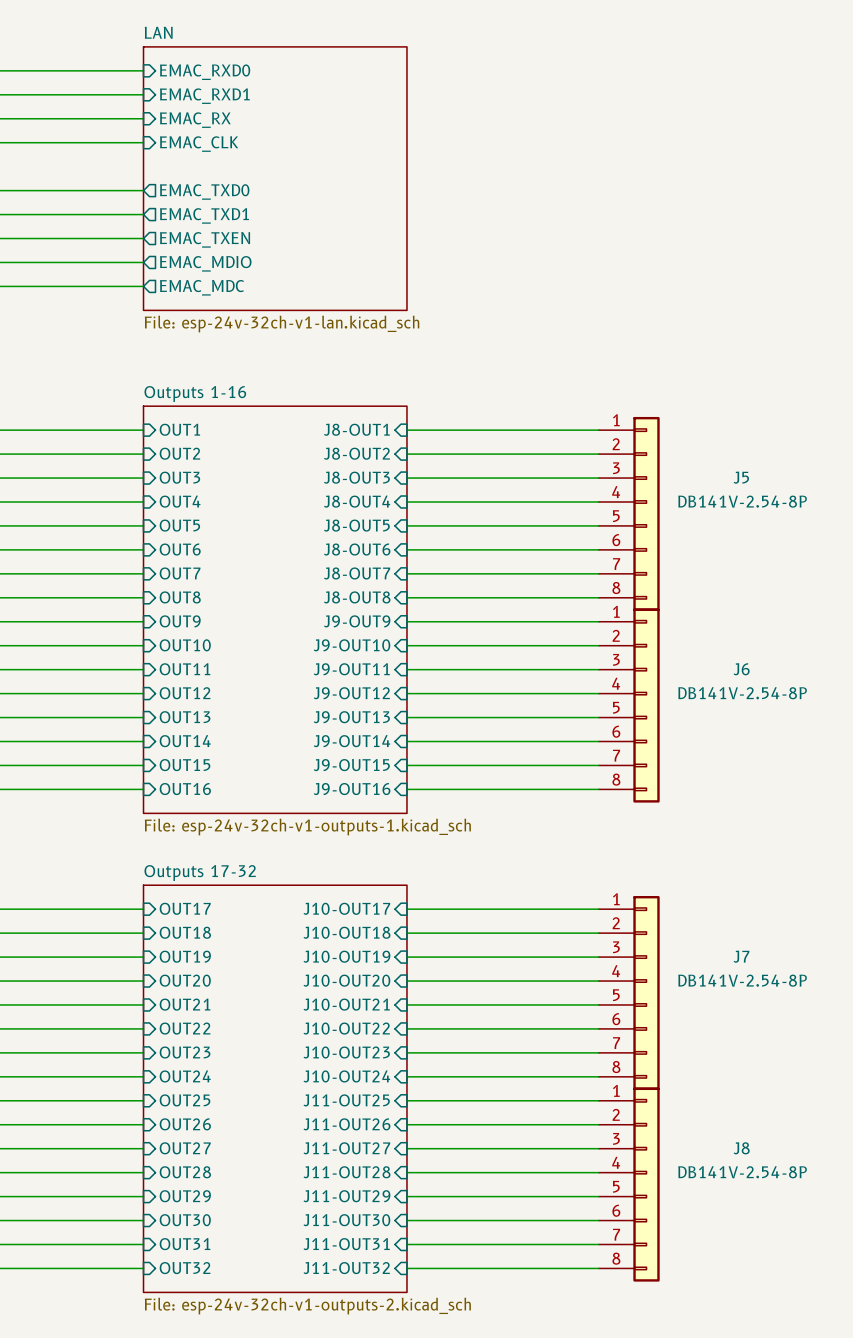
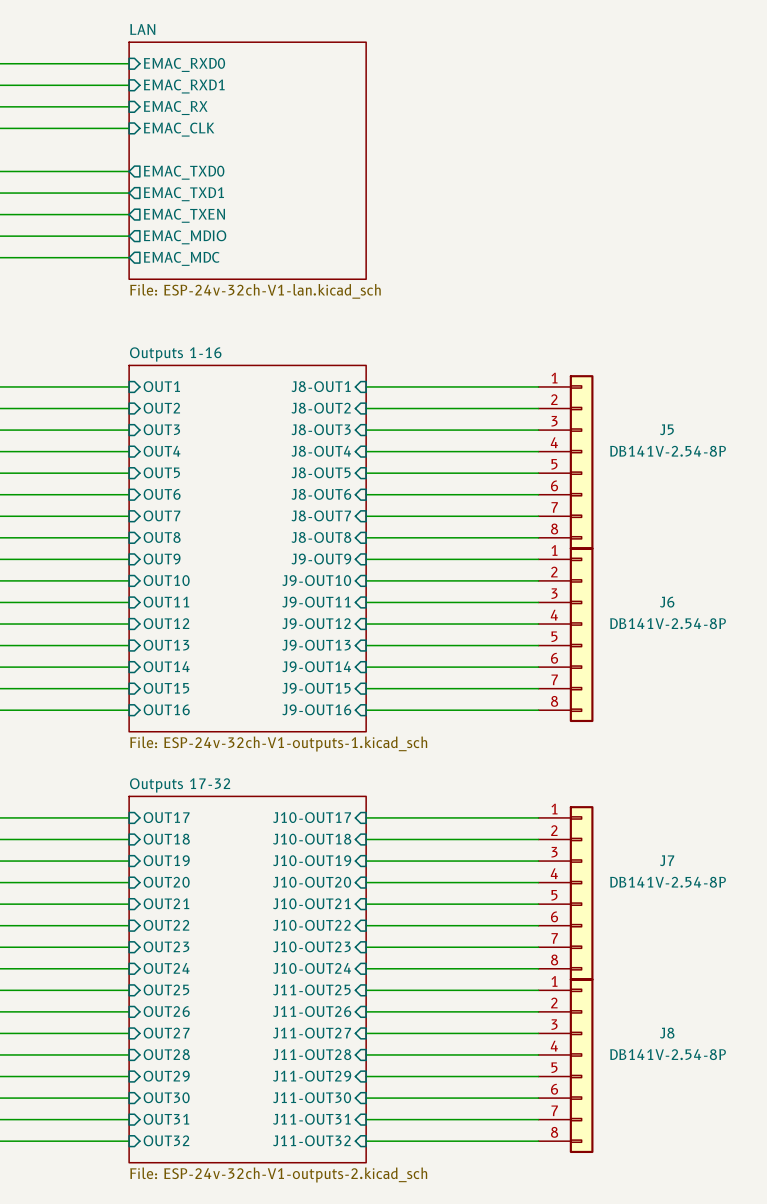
sheet LAN value: File: esp-24v-32ch-v1-lan.kicad_sch (282, 324) -> File: ESP-24v-32ch-V1-lan.kicad_sch (255, 291)
sheet Outputs 1-16 value: File: esp-24v-32ch-v1-outputs-1.kicad_sch (307, 827) -> File: ESP-24v-32ch-V1-outputs-1.kicad_sch (278, 744)
sheet Outputs 17-32 value: File: esp-24v-32ch-v1-outputs-2.kicad_sch (307, 1306) -> File: ESP-24v-32ch-V1-outputs-2.kicad_sch (278, 1174)

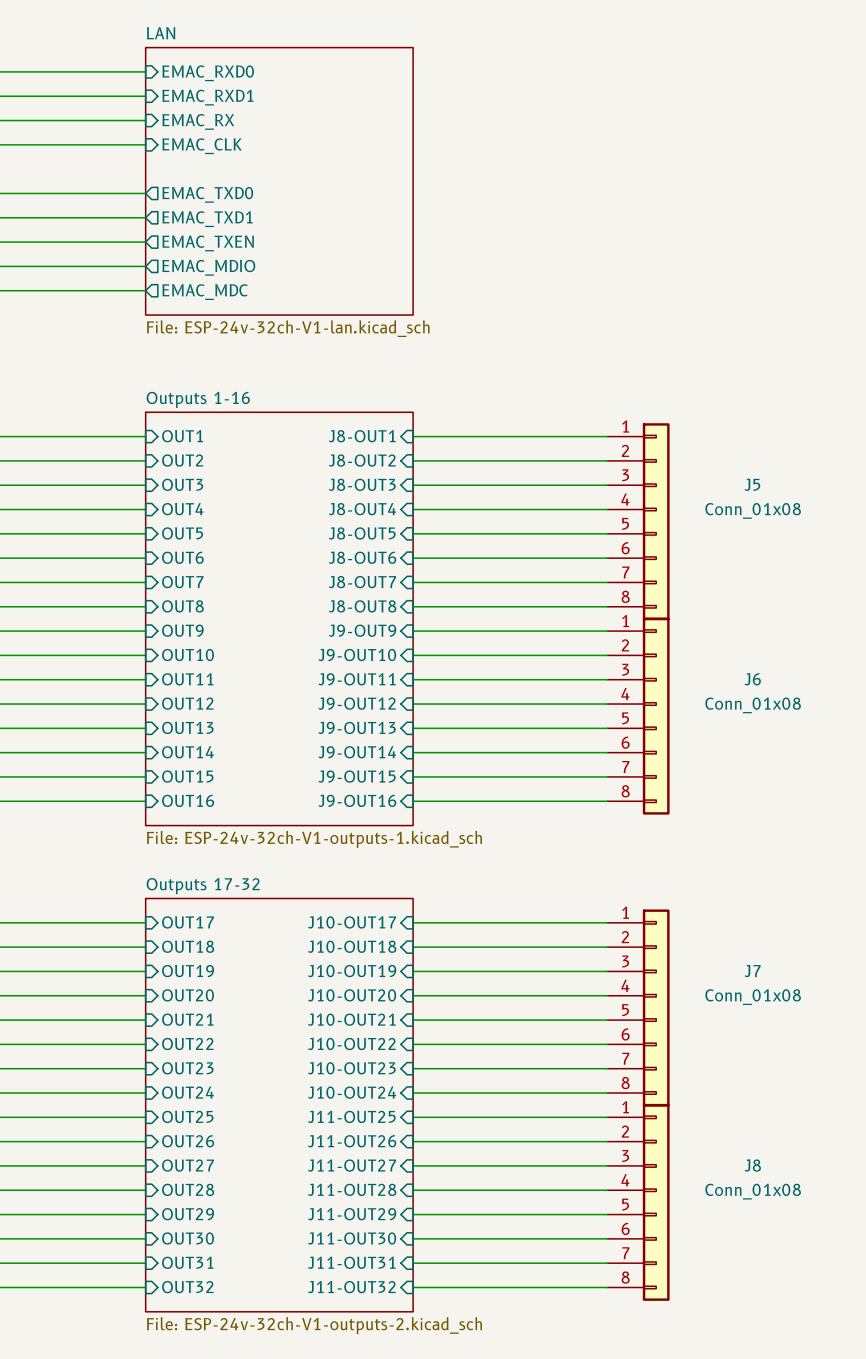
J5 value: DB141V-2.54-8P (668, 451) -> Conn_01x08 (753, 510)
J6 value: DB141V-2.54-8P (668, 623) -> Conn_01x08 (753, 705)
J7 value: DB141V-2.54-8P (668, 882) -> Conn_01x08 (753, 997)
J8 value: DB141V-2.54-8P (668, 1054) -> Conn_01x08 (753, 1191)

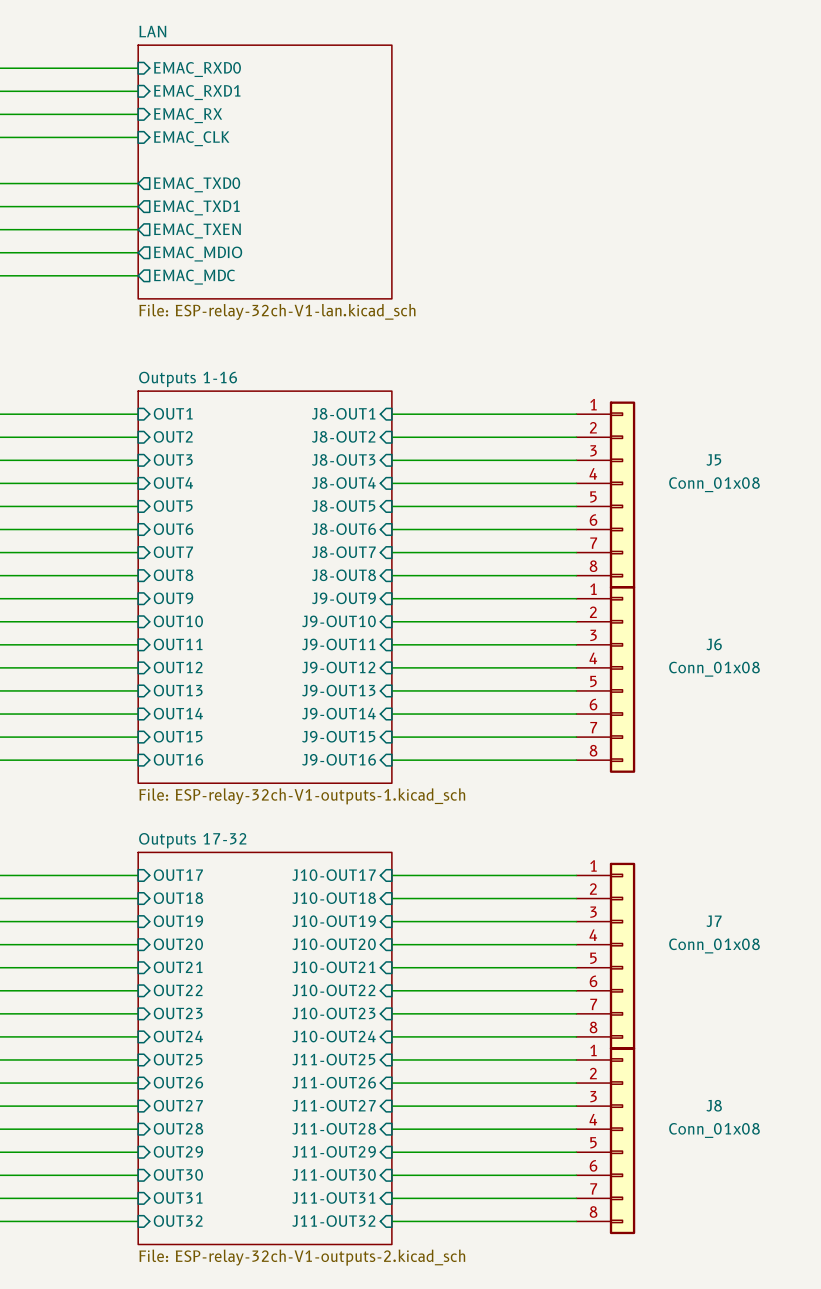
sheet LAN value: File: ESP-24v-32ch-V1-lan.kicad_sch (288, 328) -> File: ESP-relay-32ch-V1-lan.kicad_sch (277, 311)
sheet Outputs 1-16 value: File: ESP-24v-32ch-V1-outputs-1.kicad_sch (314, 839) -> File: ESP-relay-32ch-V1-outputs-1.kicad_sch (302, 796)
sheet Outputs 17-32 value: File: ESP-24v-32ch-V1-outputs-2.kicad_sch (314, 1325) -> File: ESP-relay-32ch-V1-outputs-2.kicad_sch (302, 1257)

